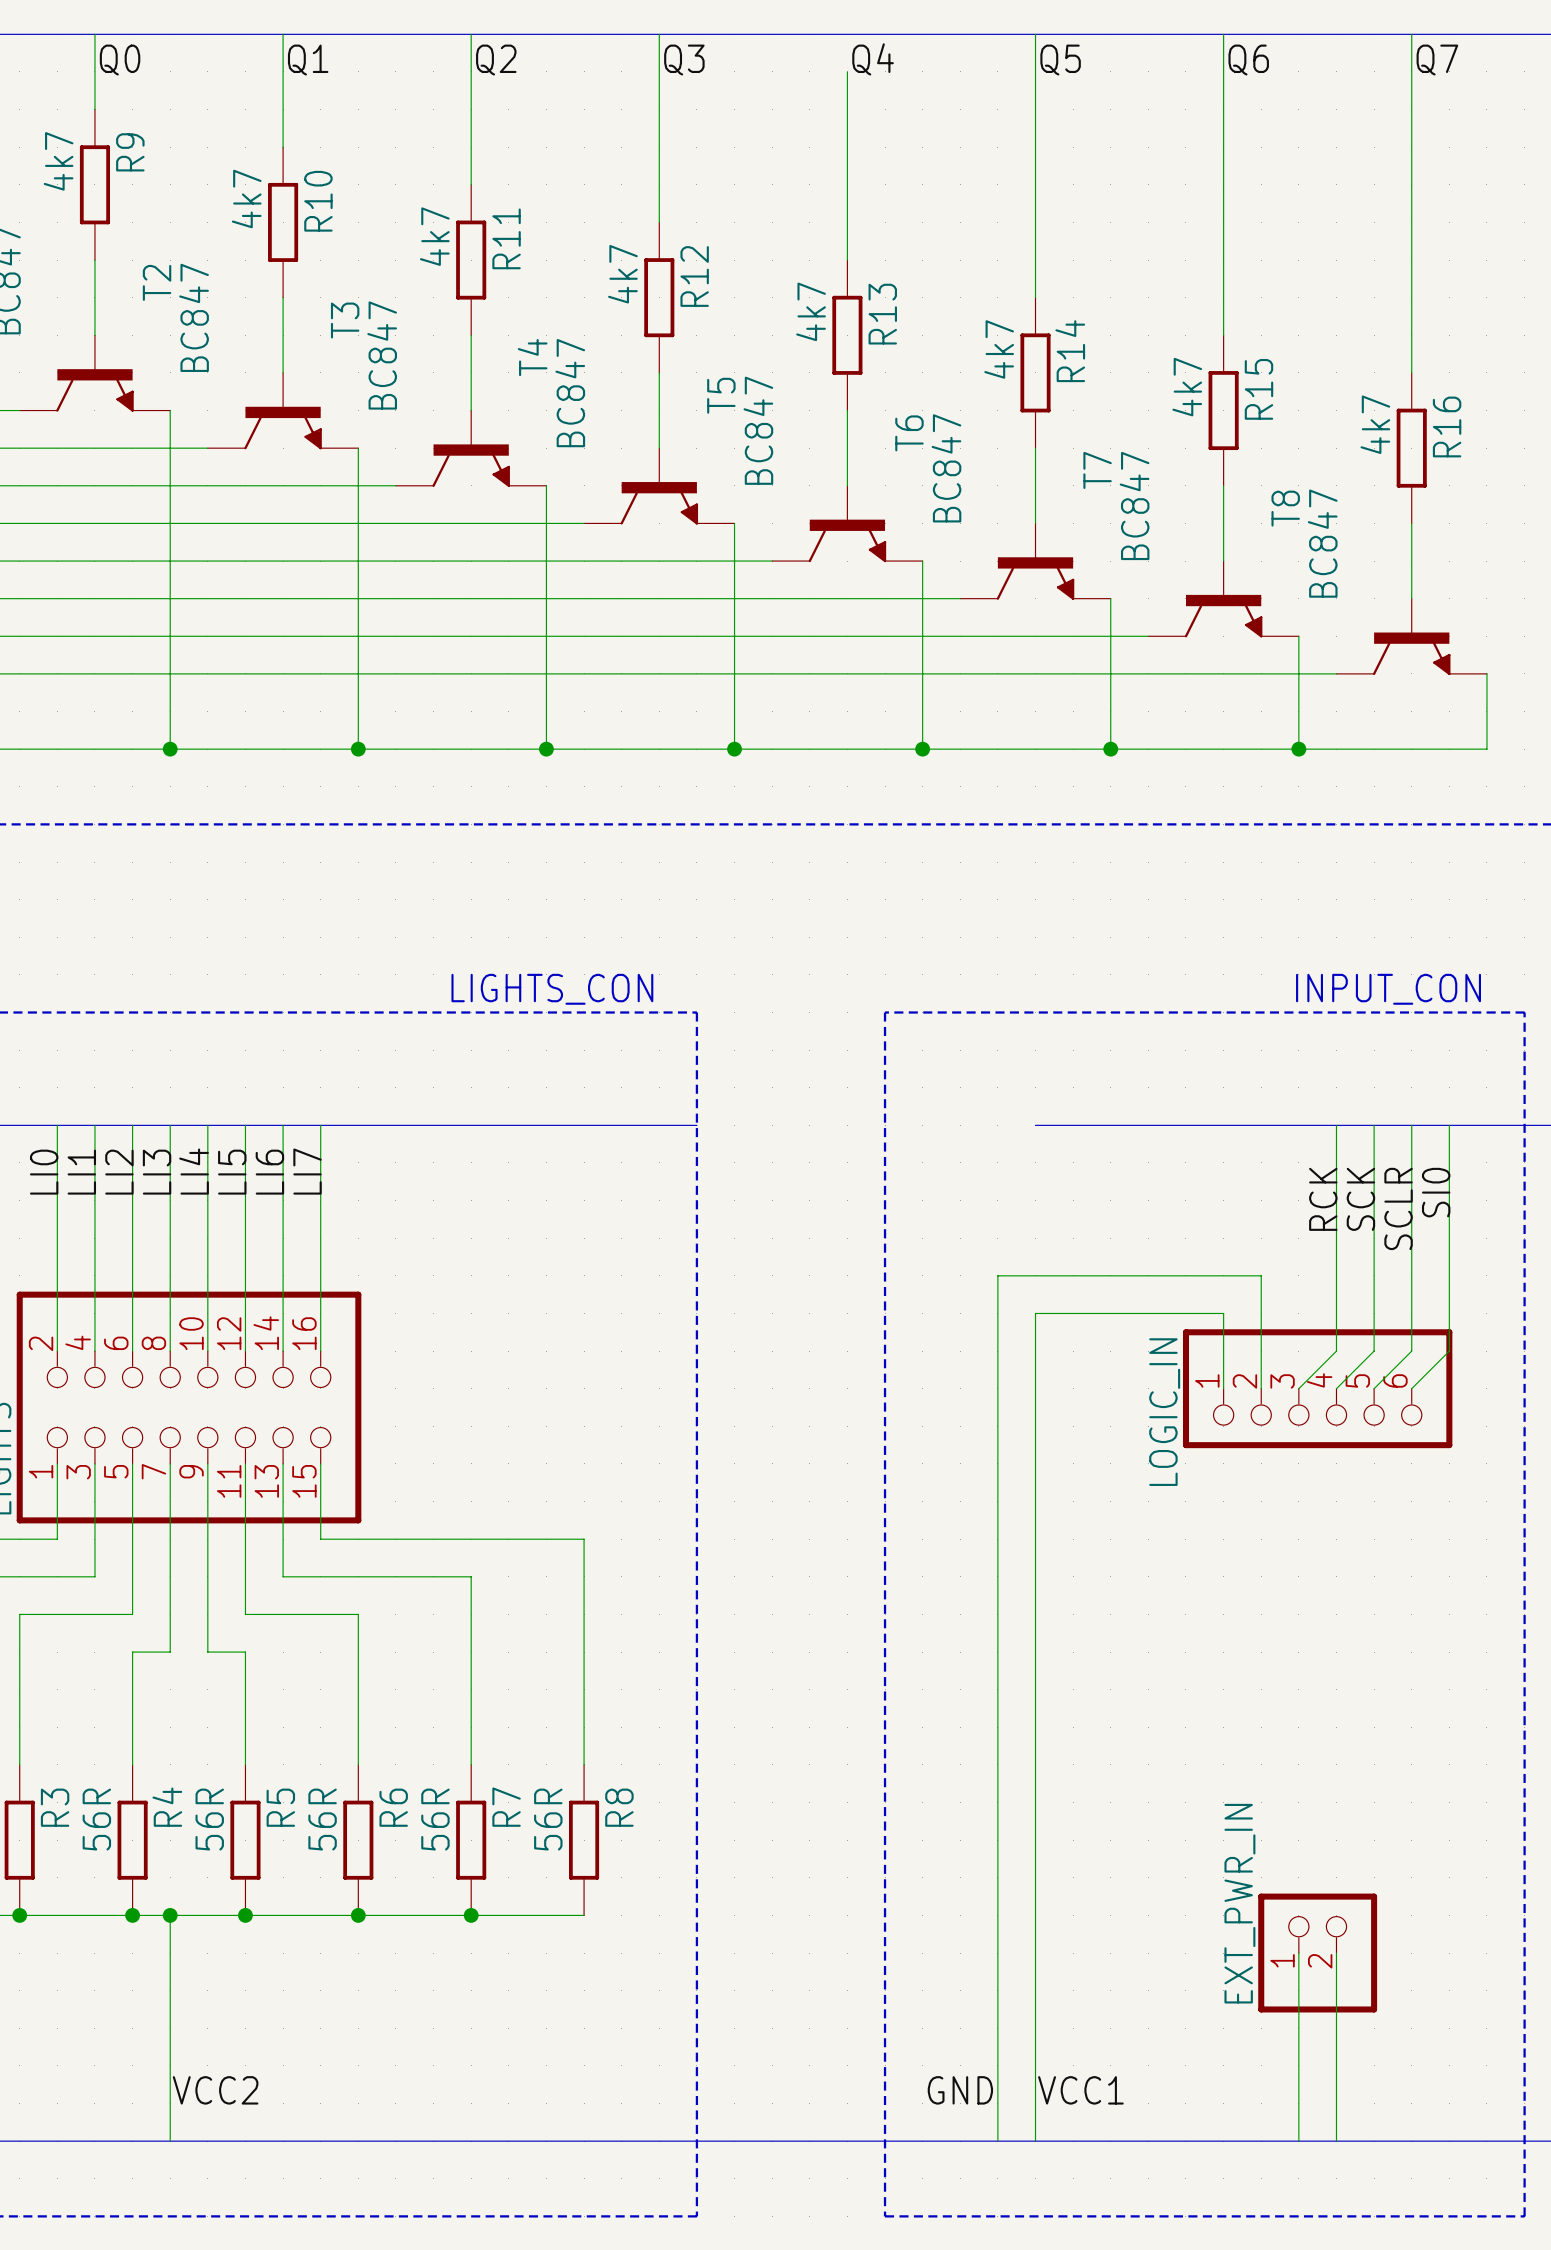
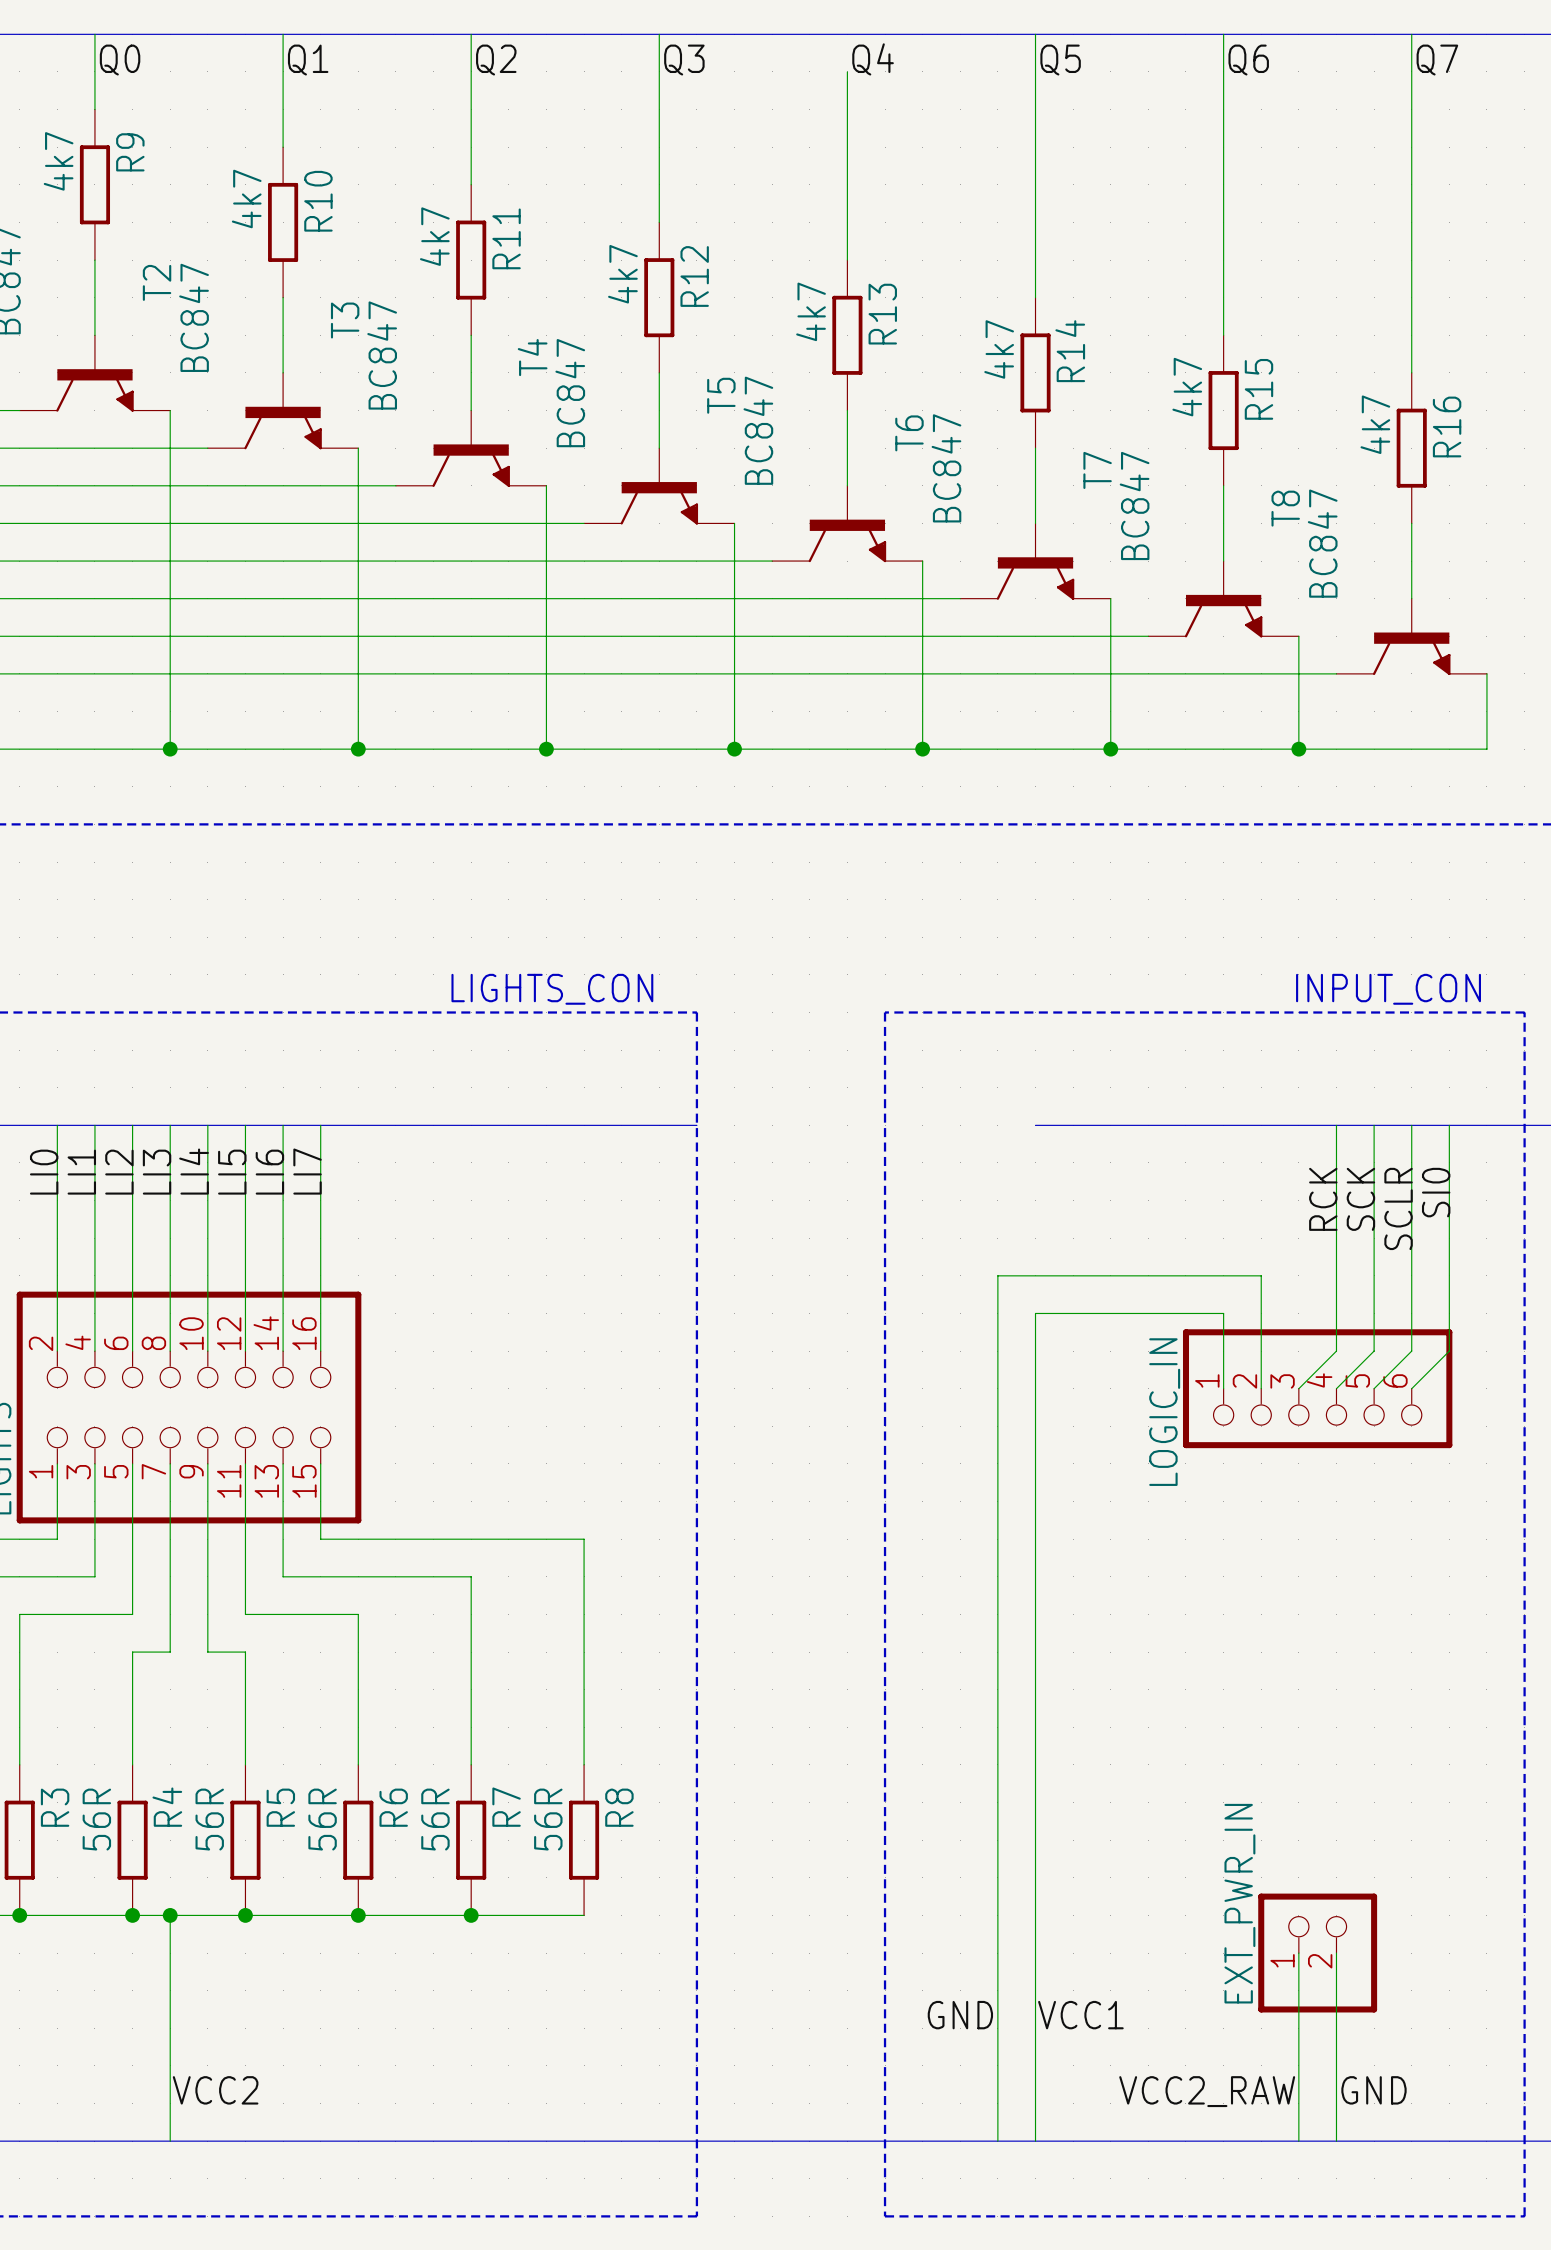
label position: GND (960, 2090) -> GND (960, 2015)
label position: VCC1 (1080, 2090) -> VCC1 (1080, 2015)
label: none -> GND (1373, 2090)
label: none -> VCC2_RAW (1207, 2091)

